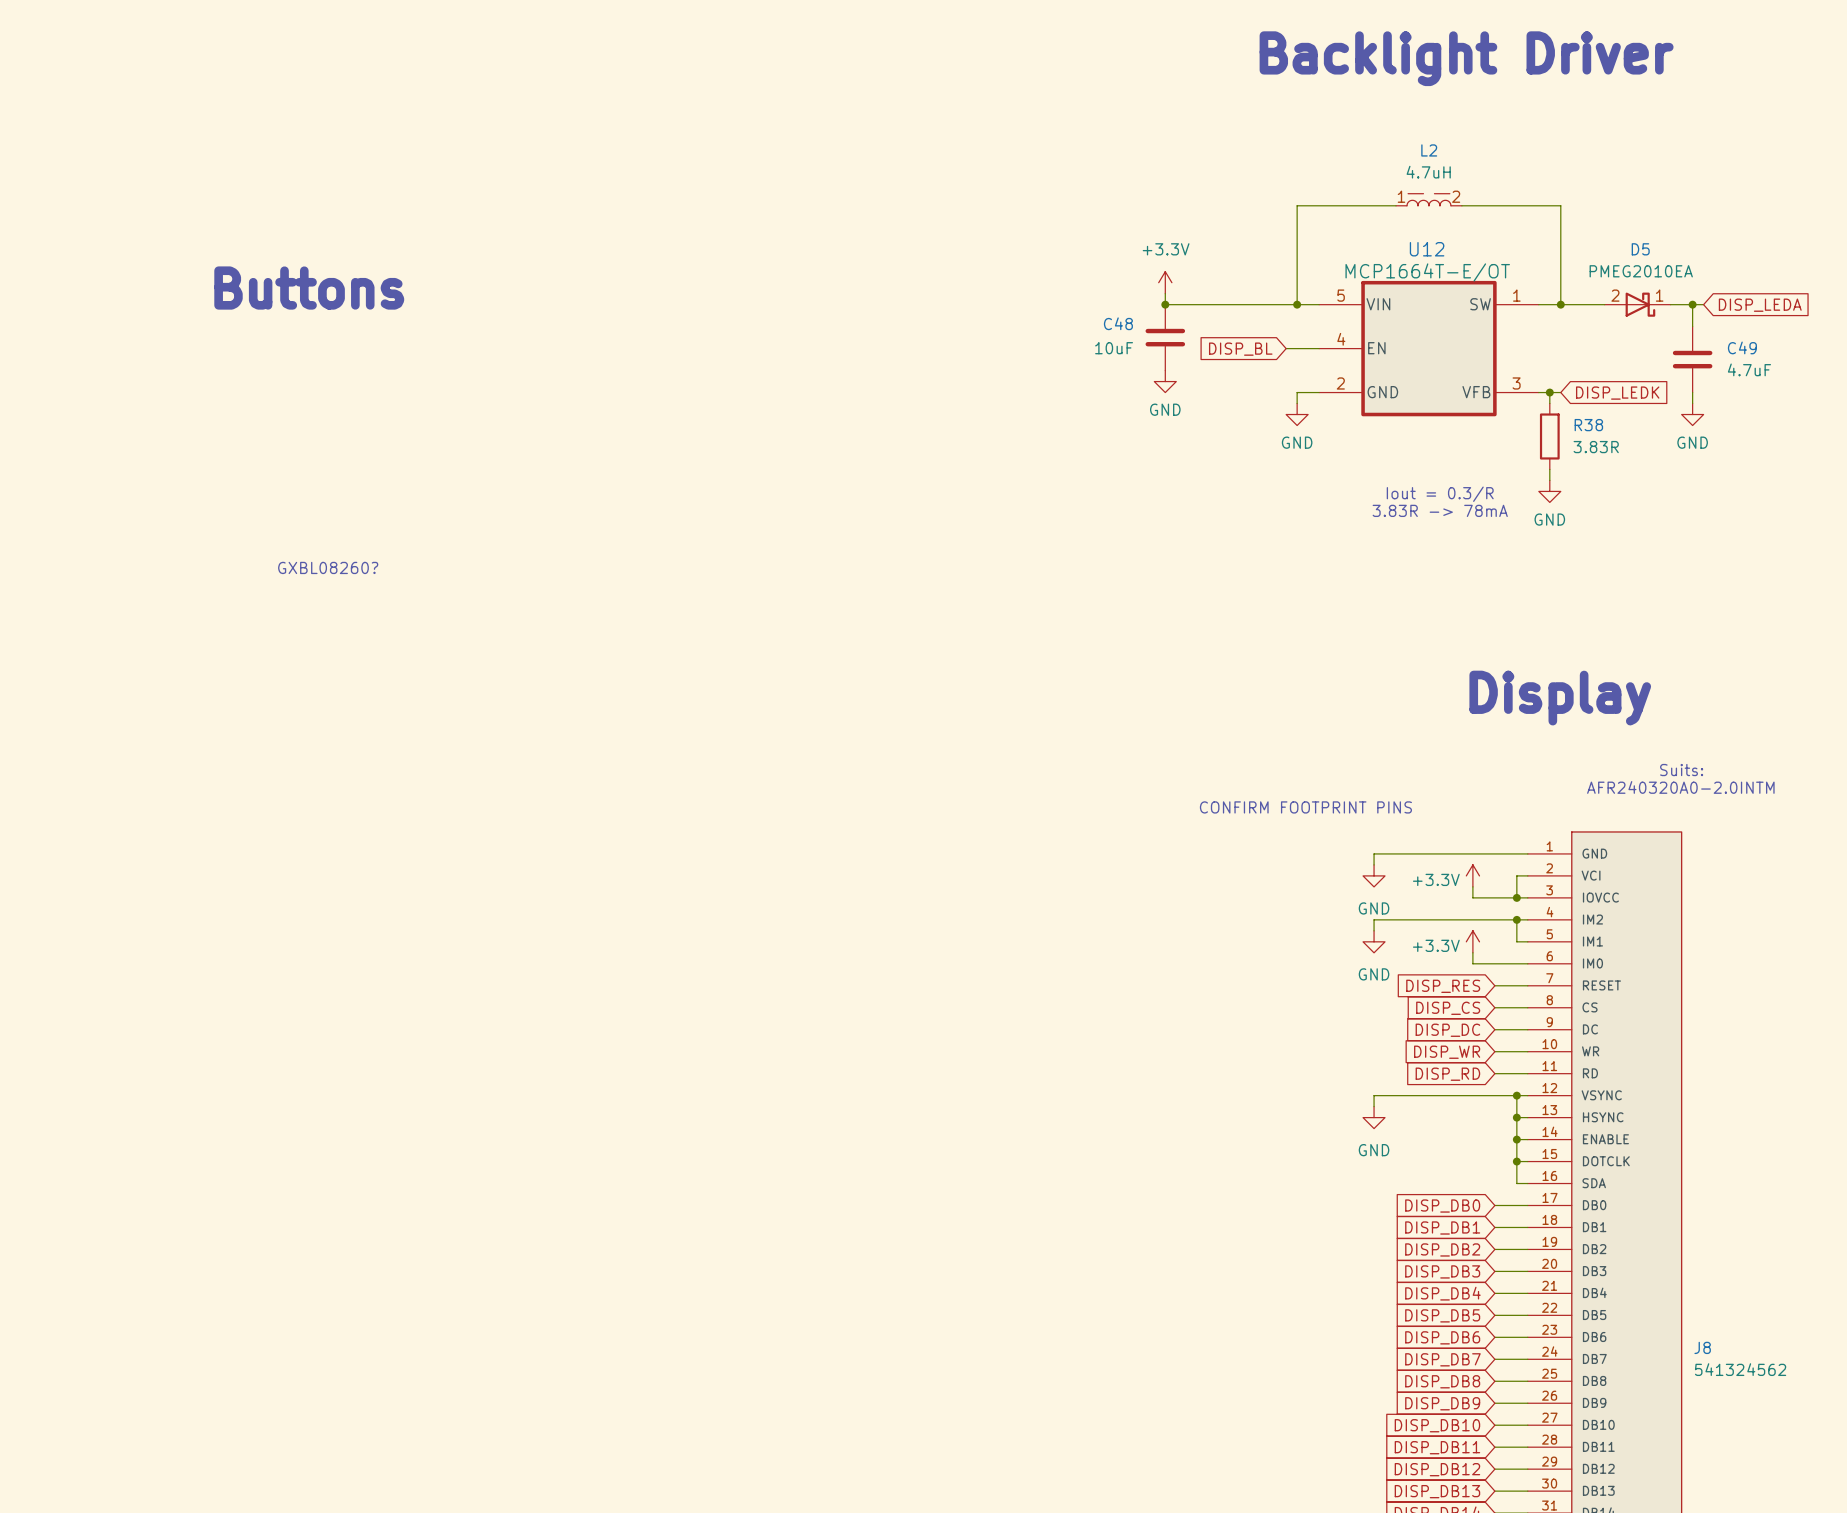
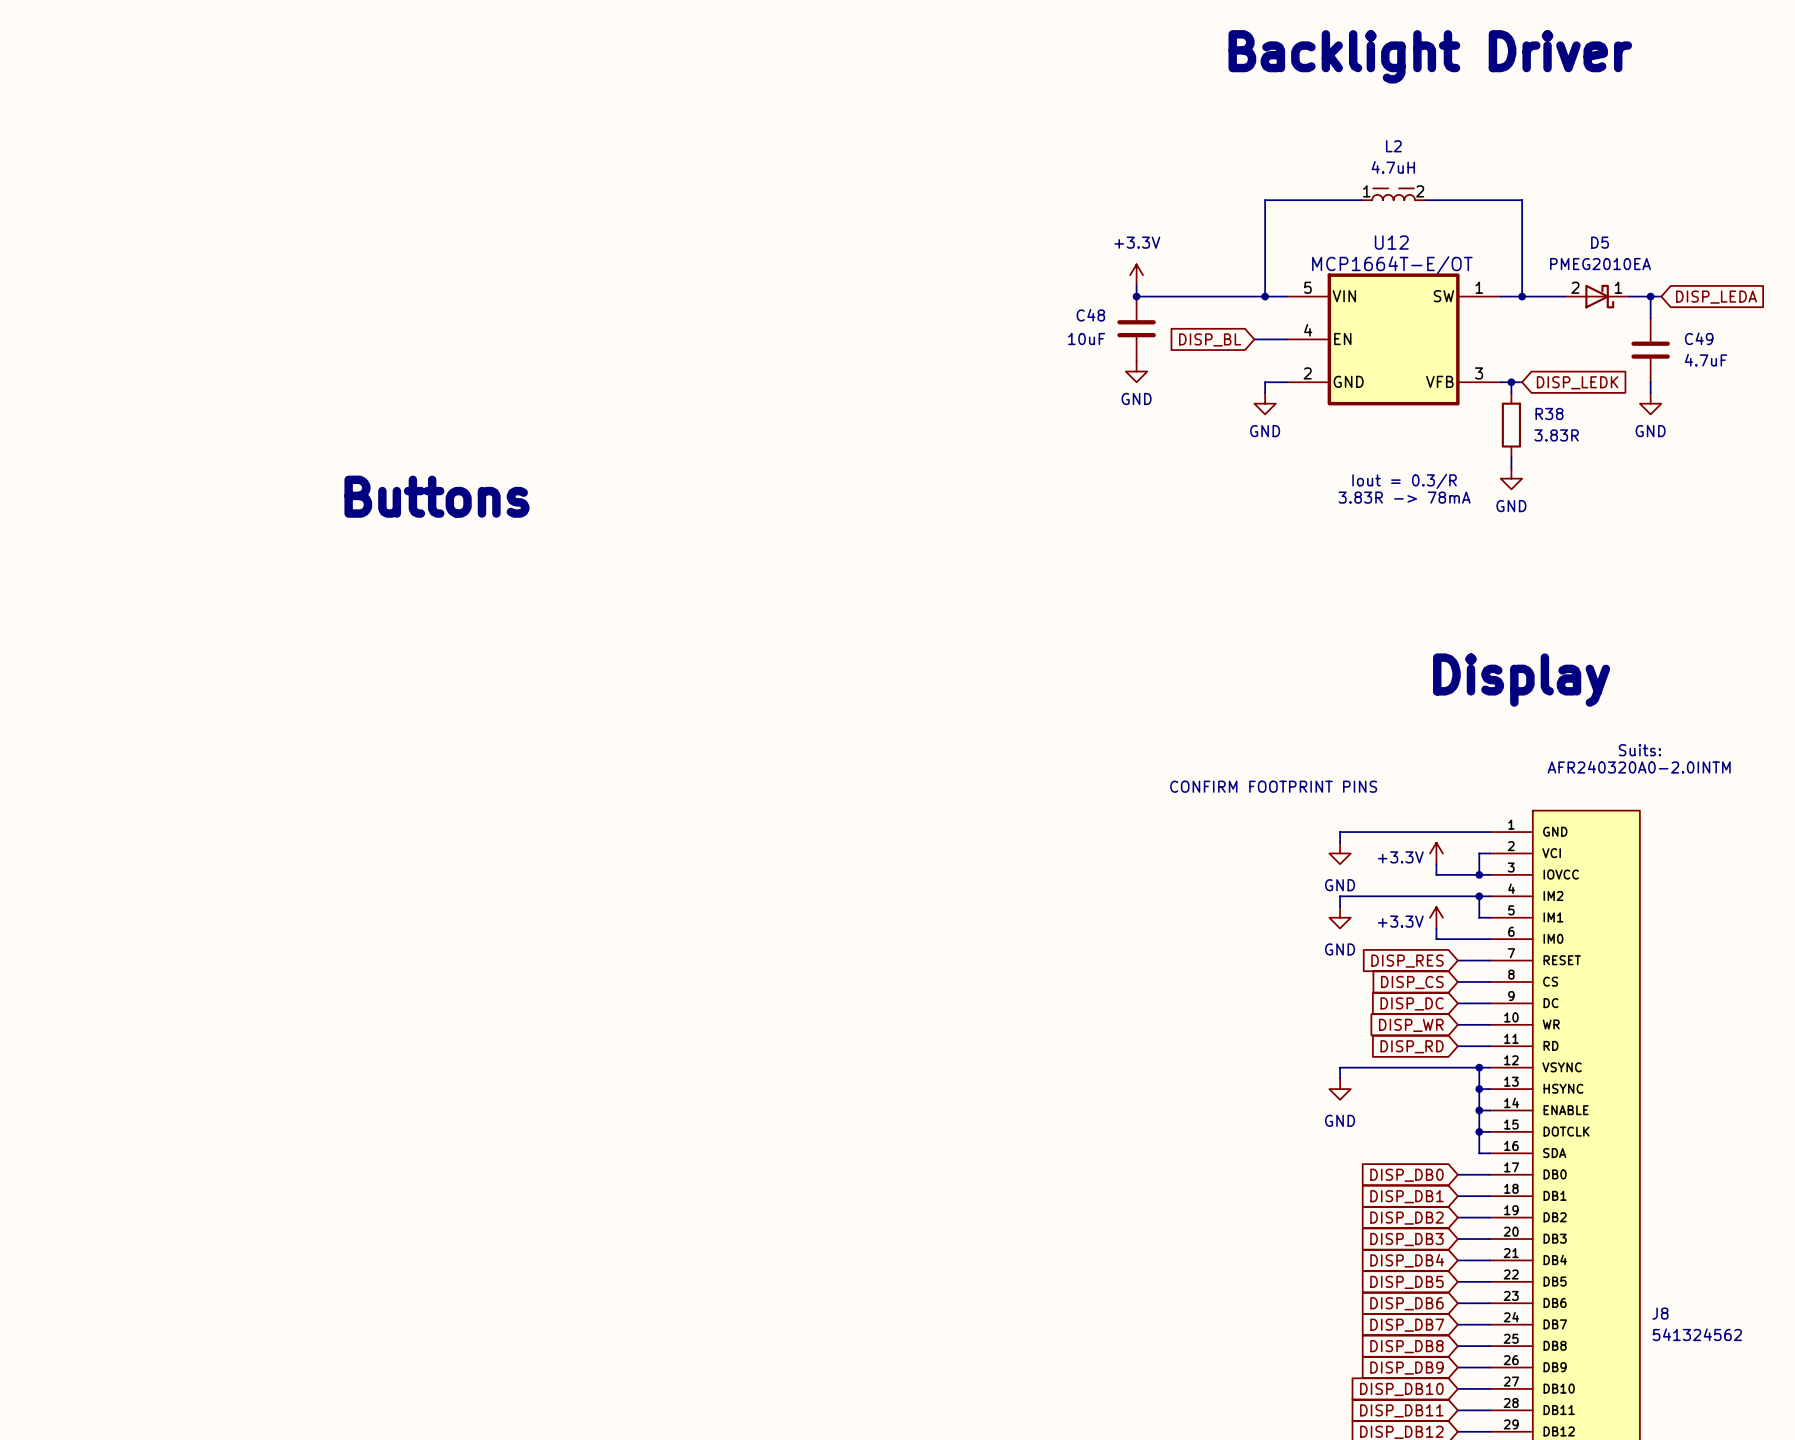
text: Buttons (309, 288) -> none
text: none -> Buttons (436, 496)
text: GXBL08260? (328, 567) -> none

